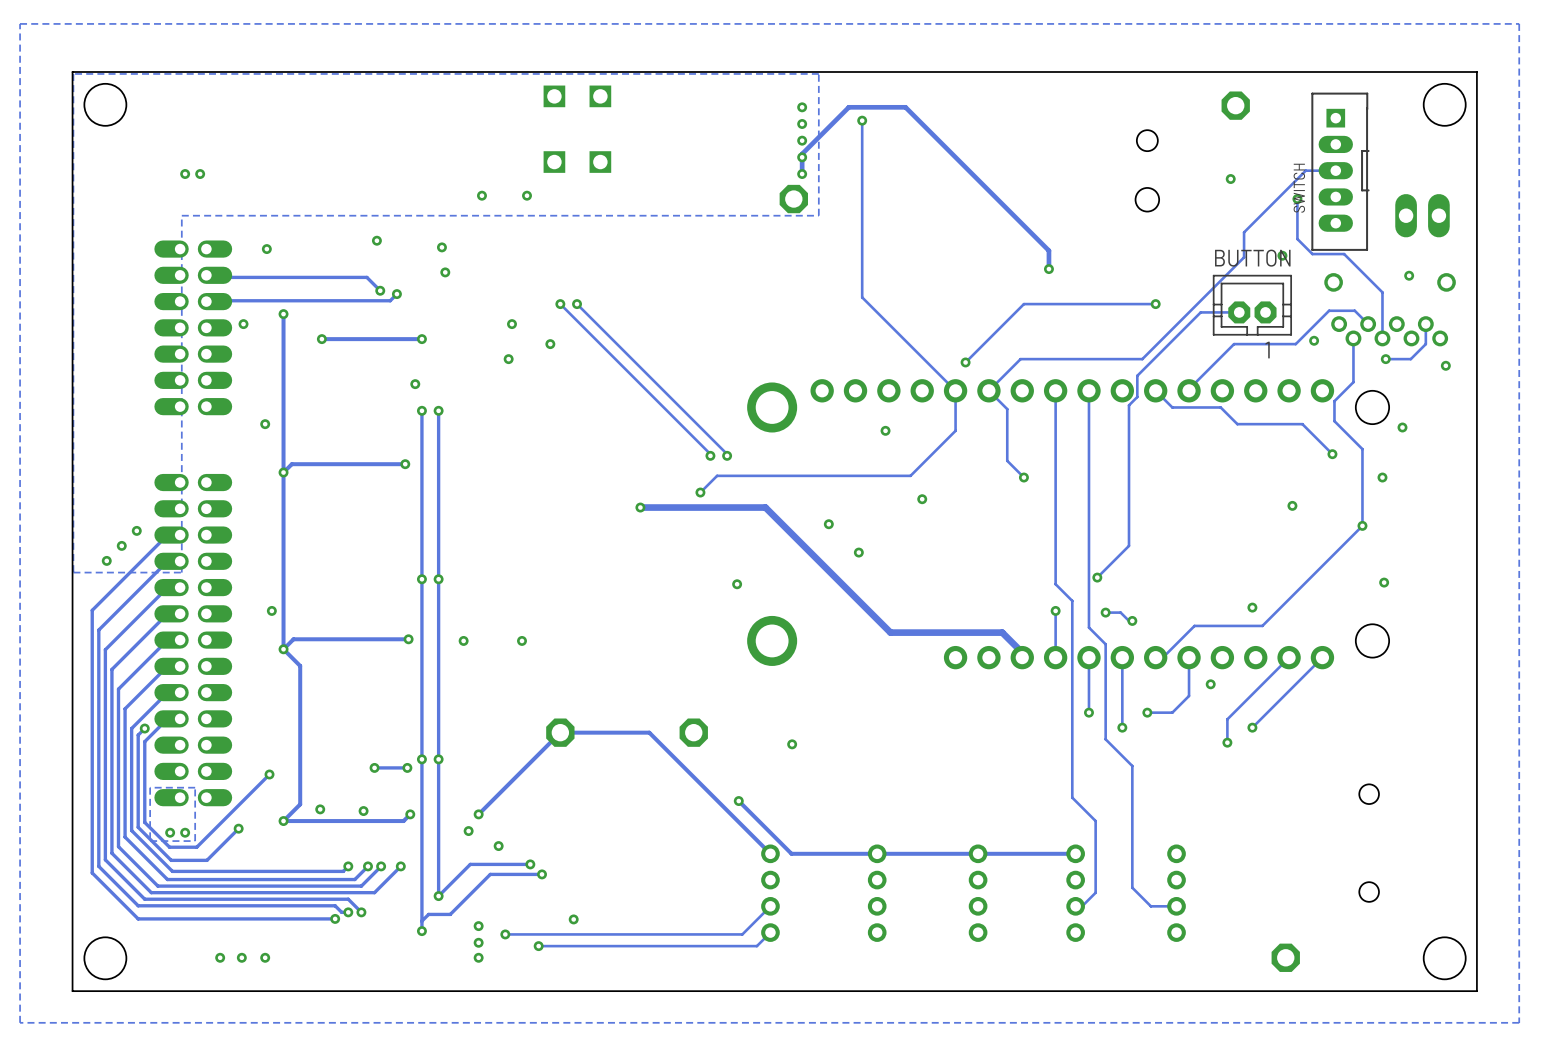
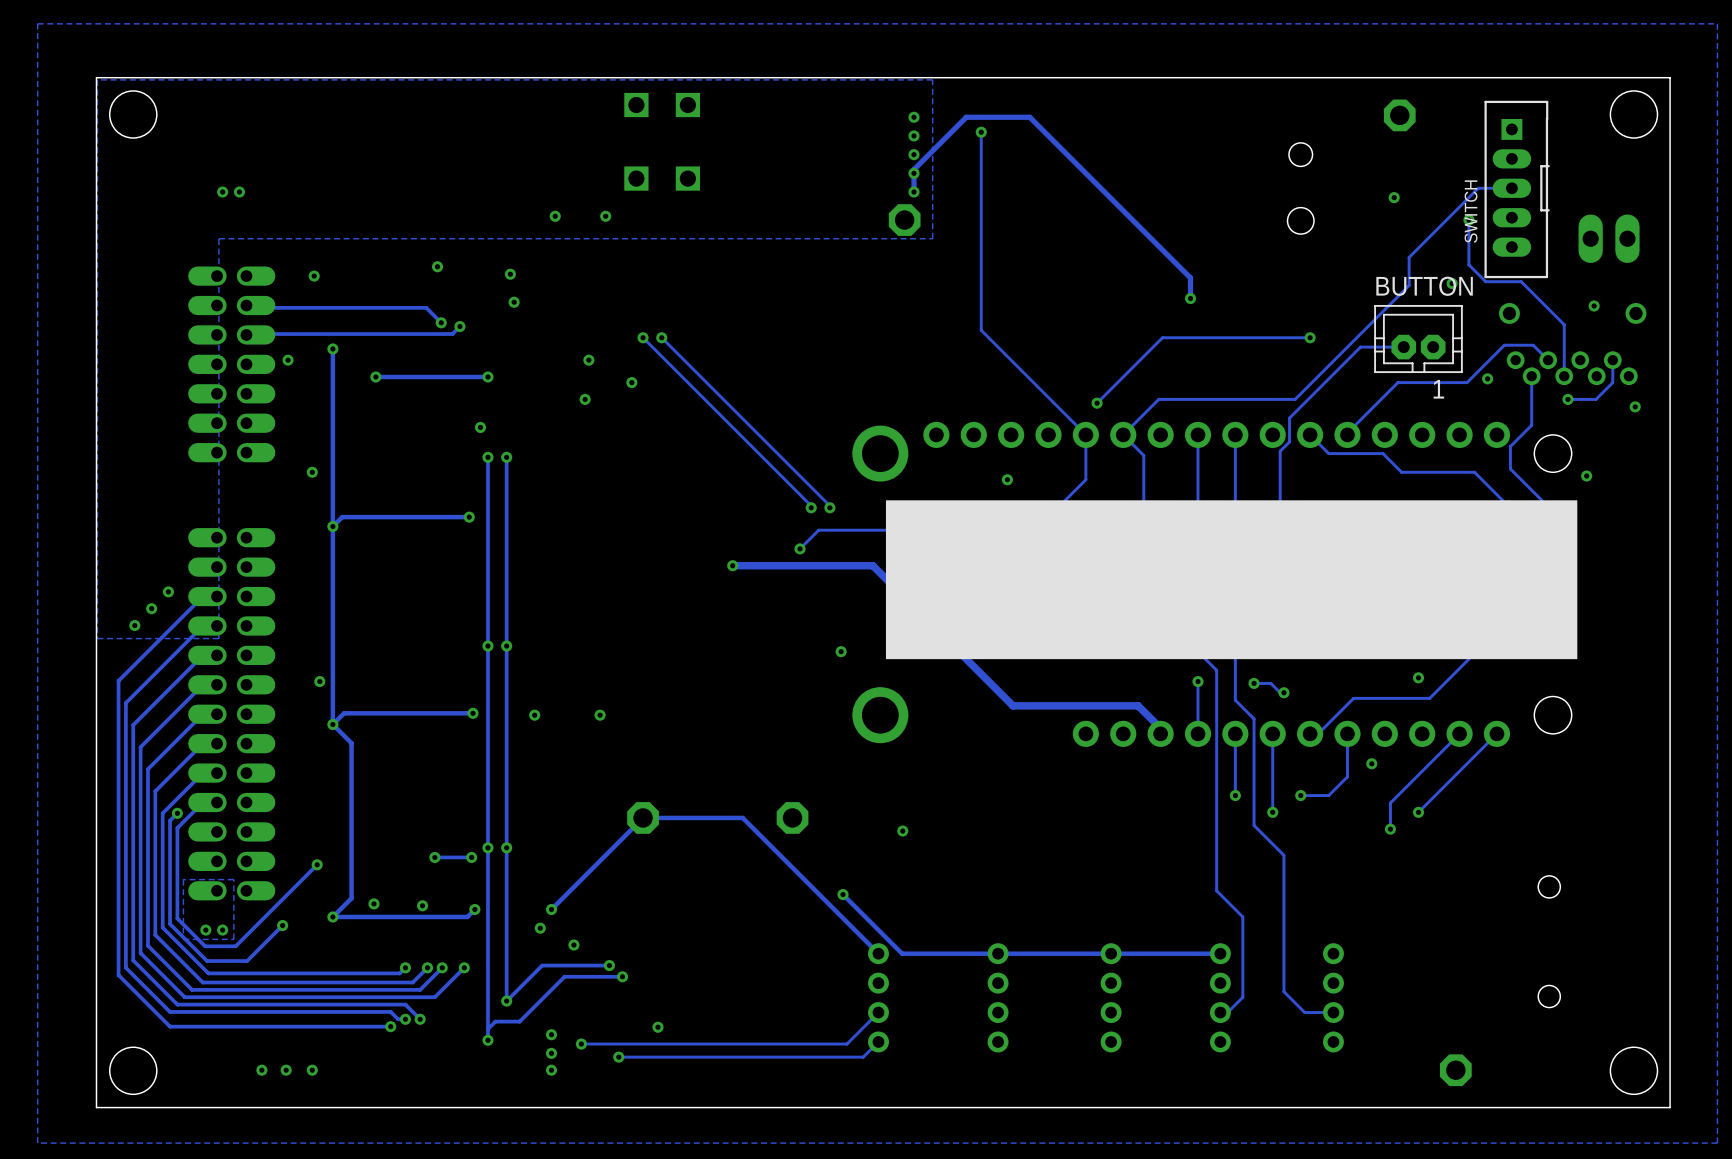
drawing: none -> [885, 500, 1578, 660]

